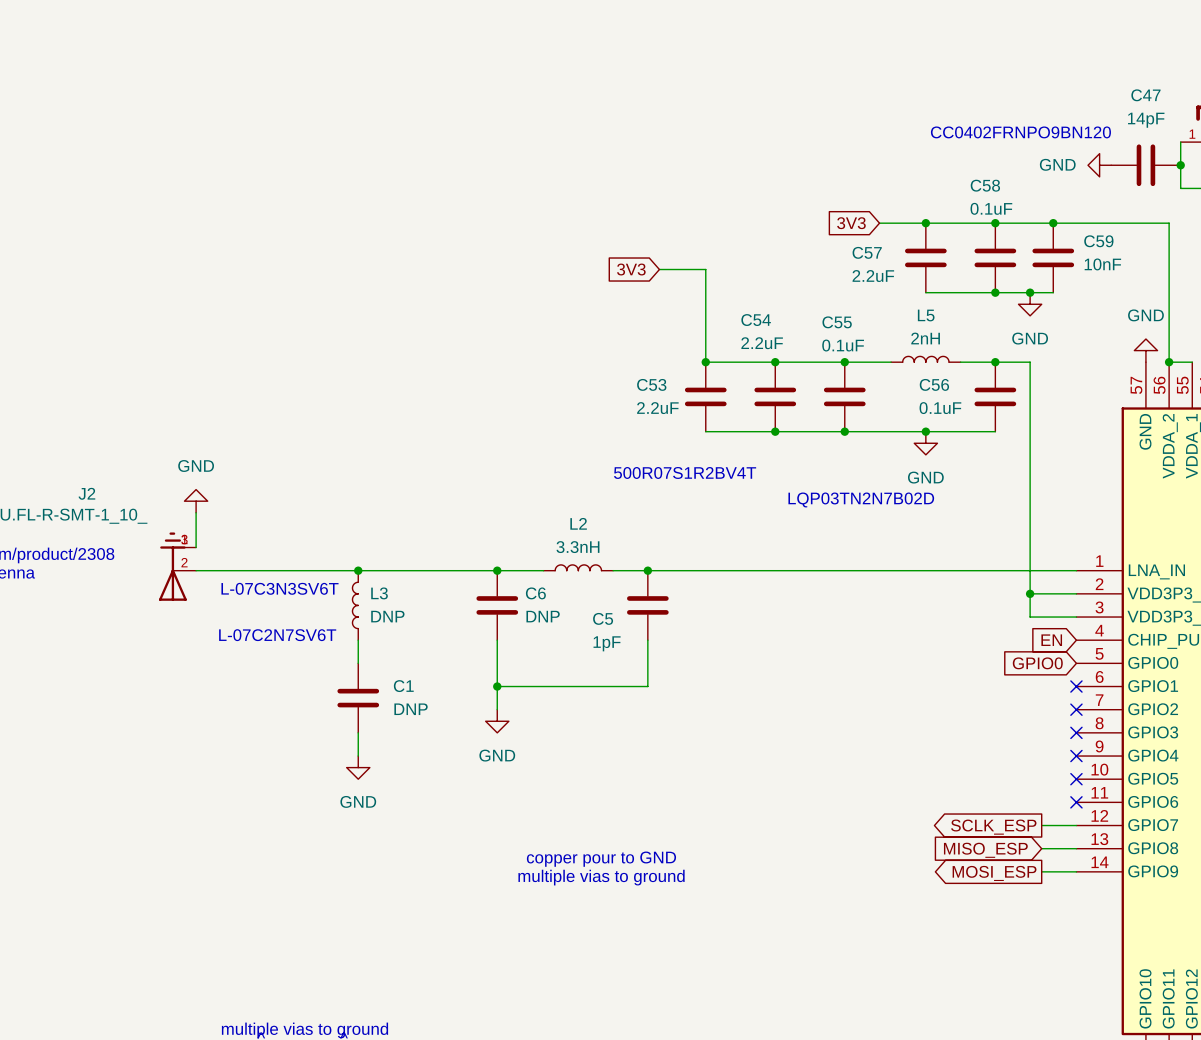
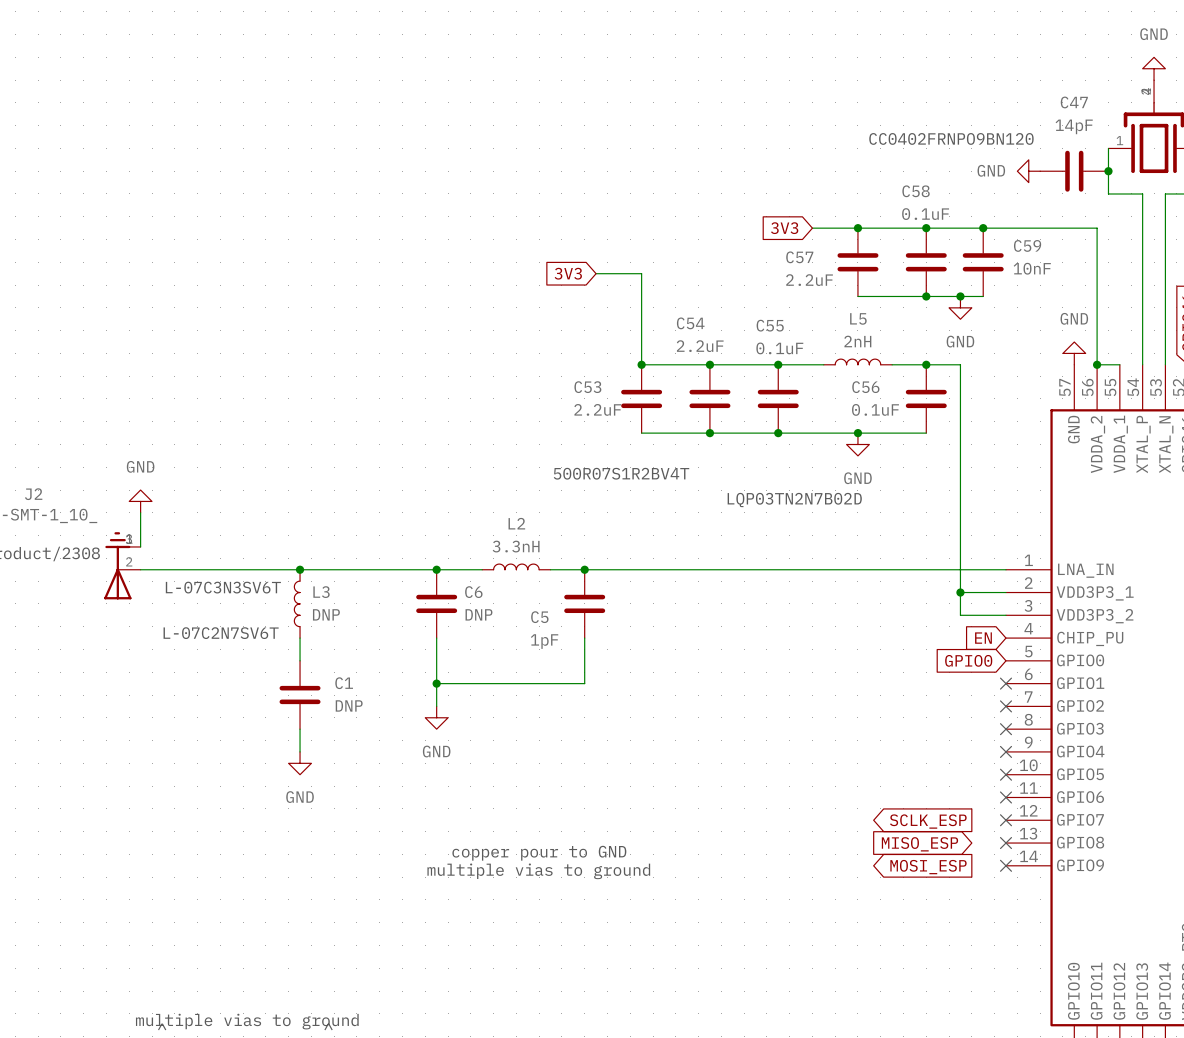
wire: (1041, 825) (1076, 825) -> none
no-connect mark: none -> (1005, 820)
wire: (1041, 848) (1076, 848) -> none
no-connect mark: none -> (1005, 843)
wire: (1041, 871) (1076, 871) -> none
no-connect mark: none -> (1005, 865)

